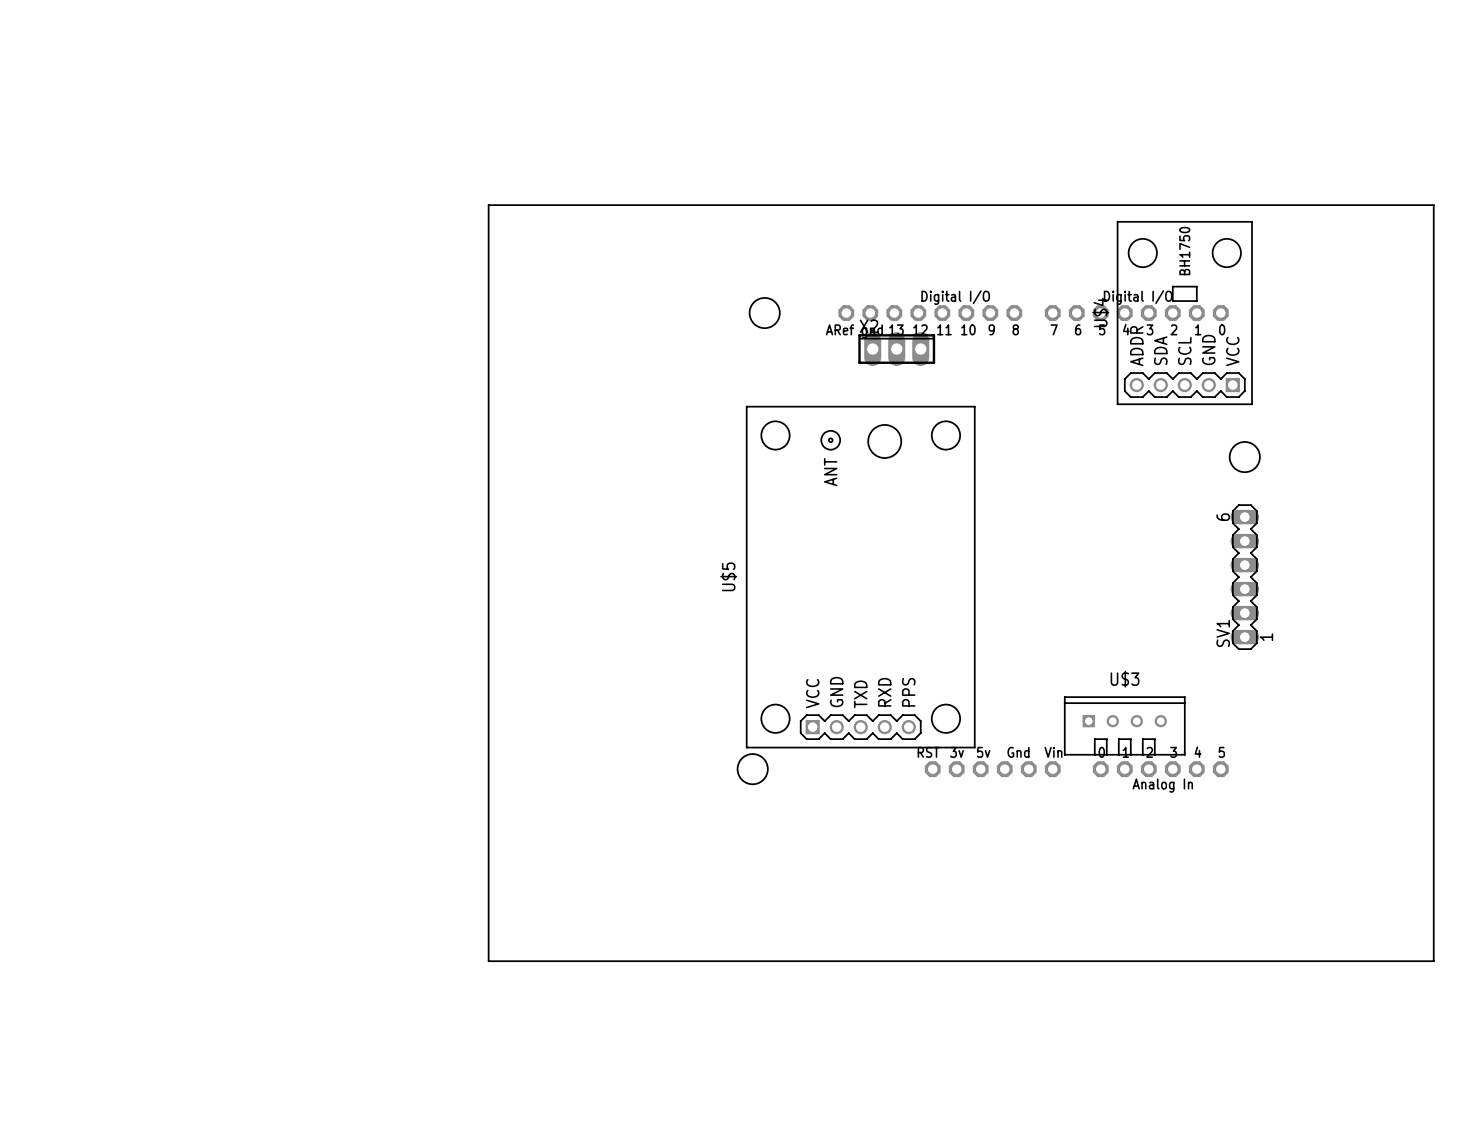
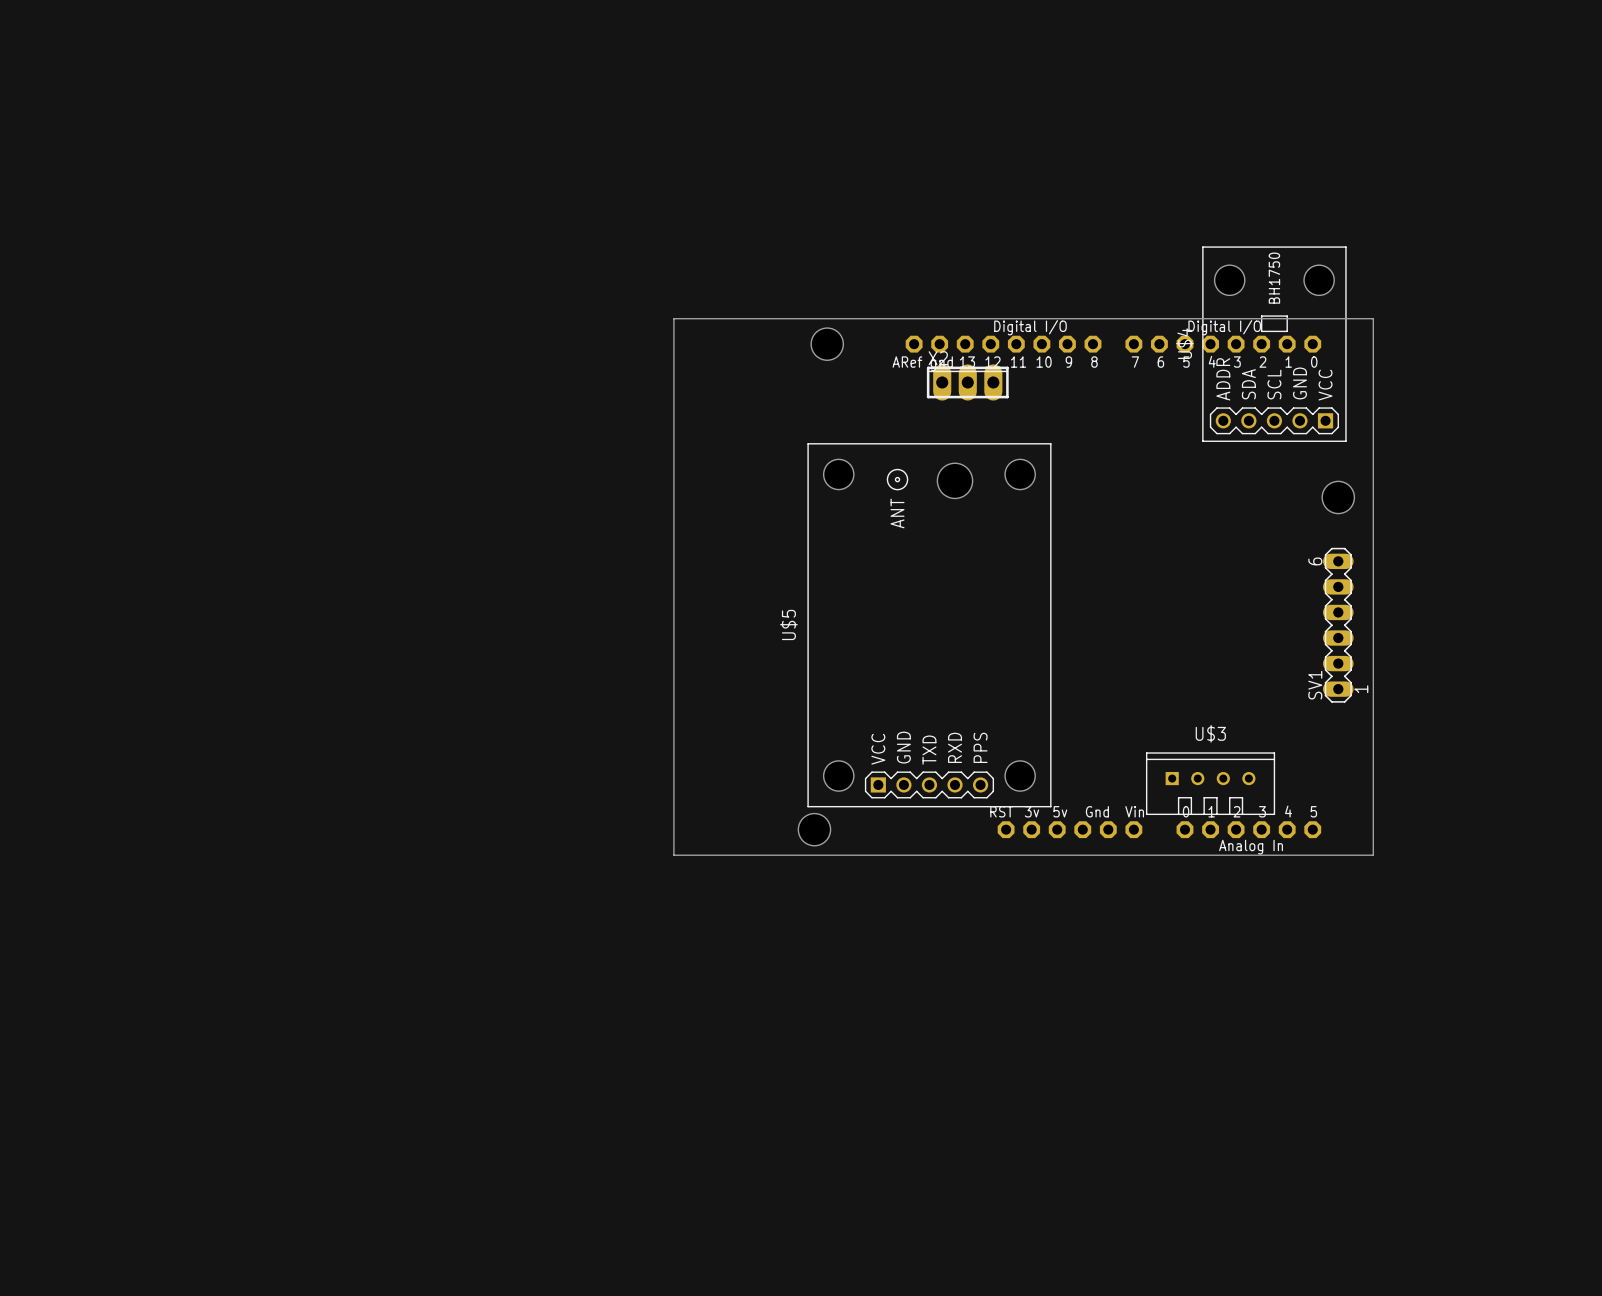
board edge: (488, 205) (1433, 205) (1433, 961) (488, 961) (488, 205) -> none
board edge: none -> (673, 318) (1373, 318) (1373, 855) (673, 855) (673, 318)

